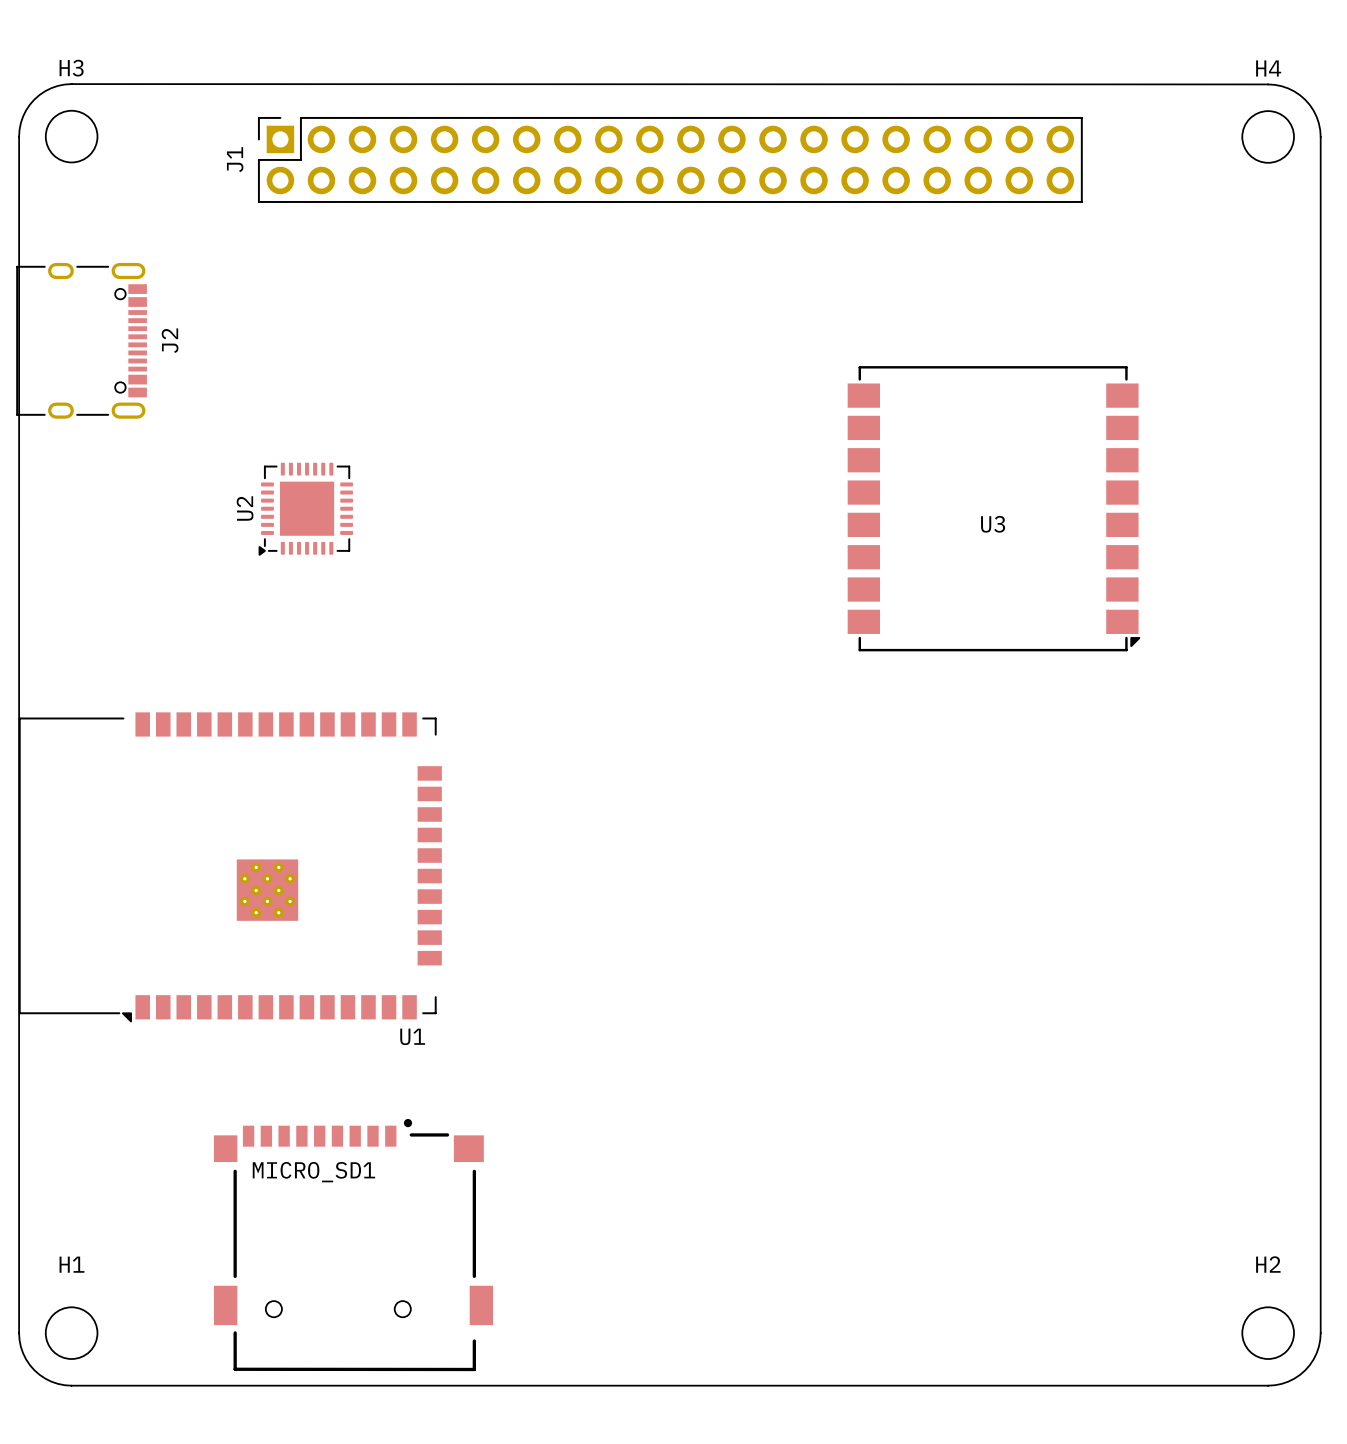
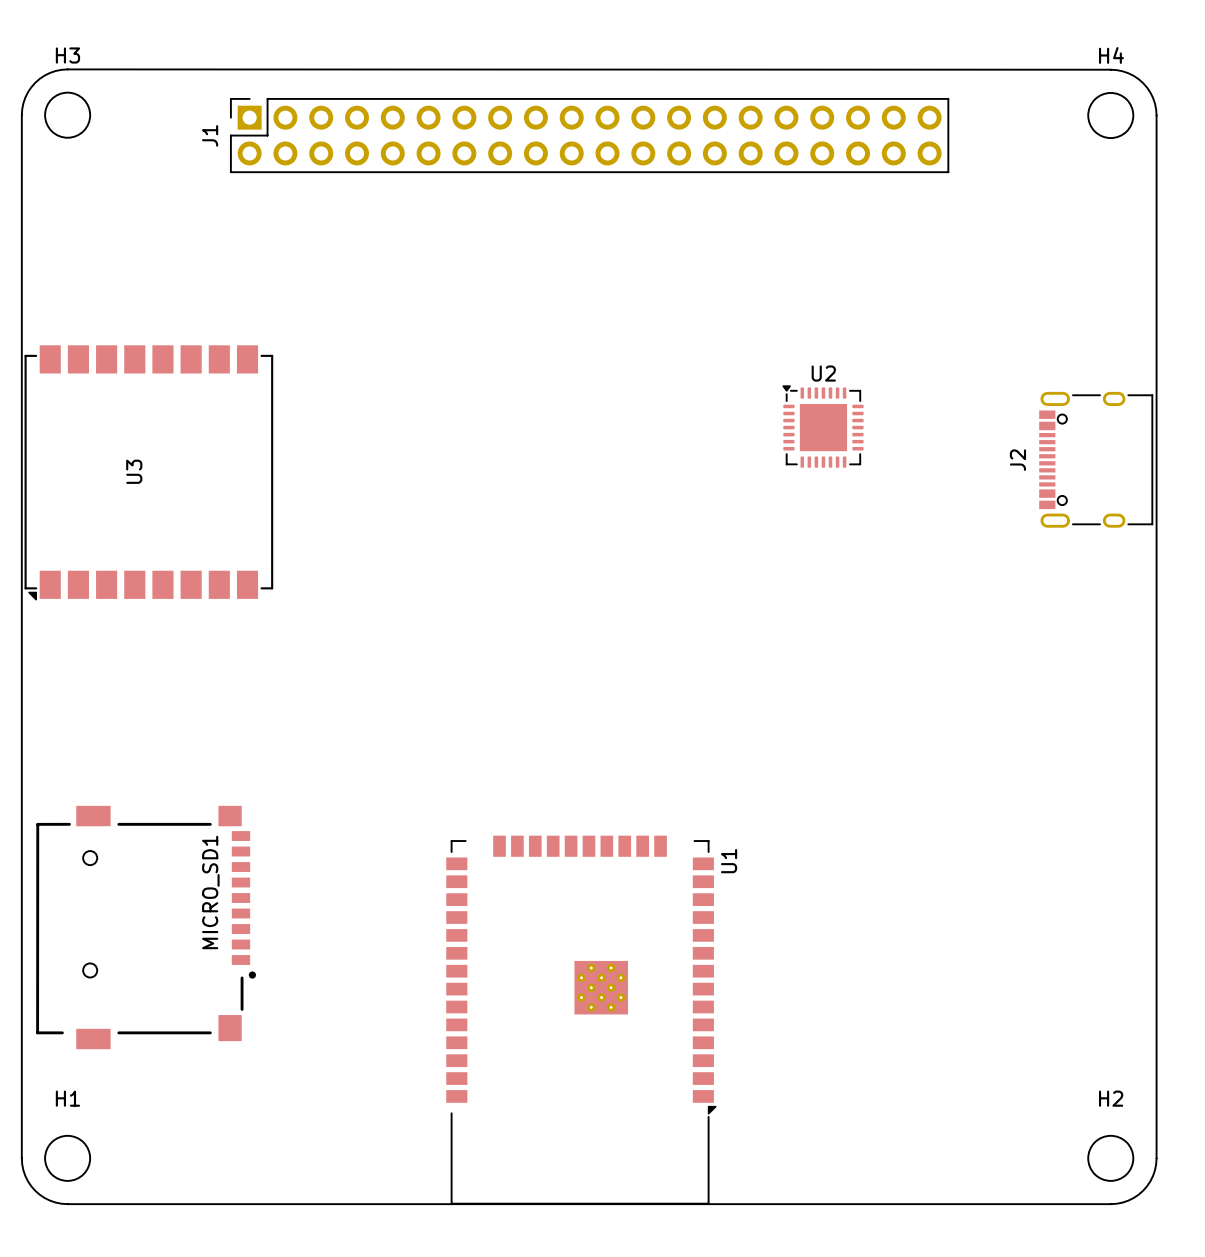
J2 rotation: 0° (81, 340) -> 180° (1096, 459)
J2 position: (81, 340) -> (1096, 459)
U3 rotation: 0° (994, 508) -> 90° clockwise (148, 472)
U3 position: (994, 508) -> (148, 472)
U2 rotation: 0° (305, 509) -> 90° clockwise (823, 426)
U2 position: (305, 509) -> (823, 426)
U1 rotation: 0° (230, 867) -> 90° counterclockwise (581, 1020)
U1 position: (230, 867) -> (581, 1020)
MICRO_SD1 rotation: 0° (353, 1245) -> 90° clockwise (146, 927)
MICRO_SD1 position: (353, 1245) -> (146, 927)

